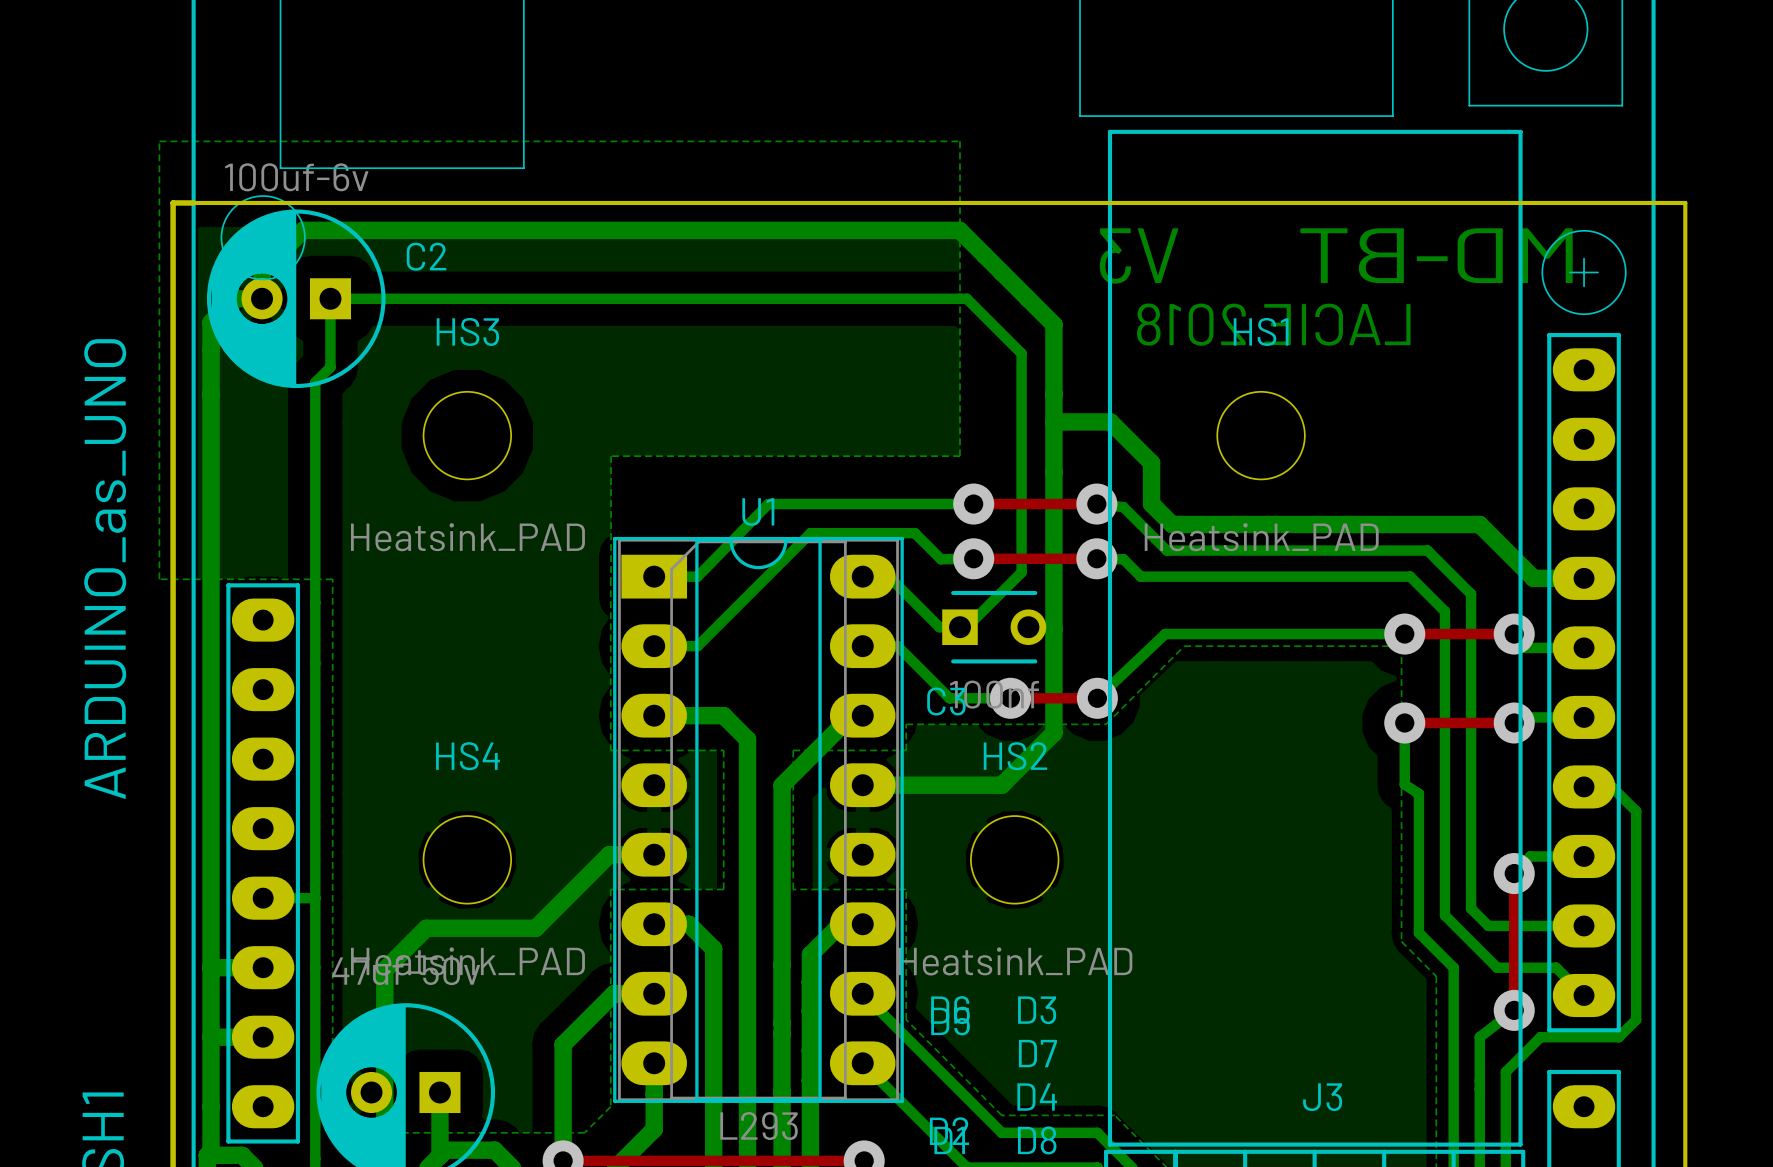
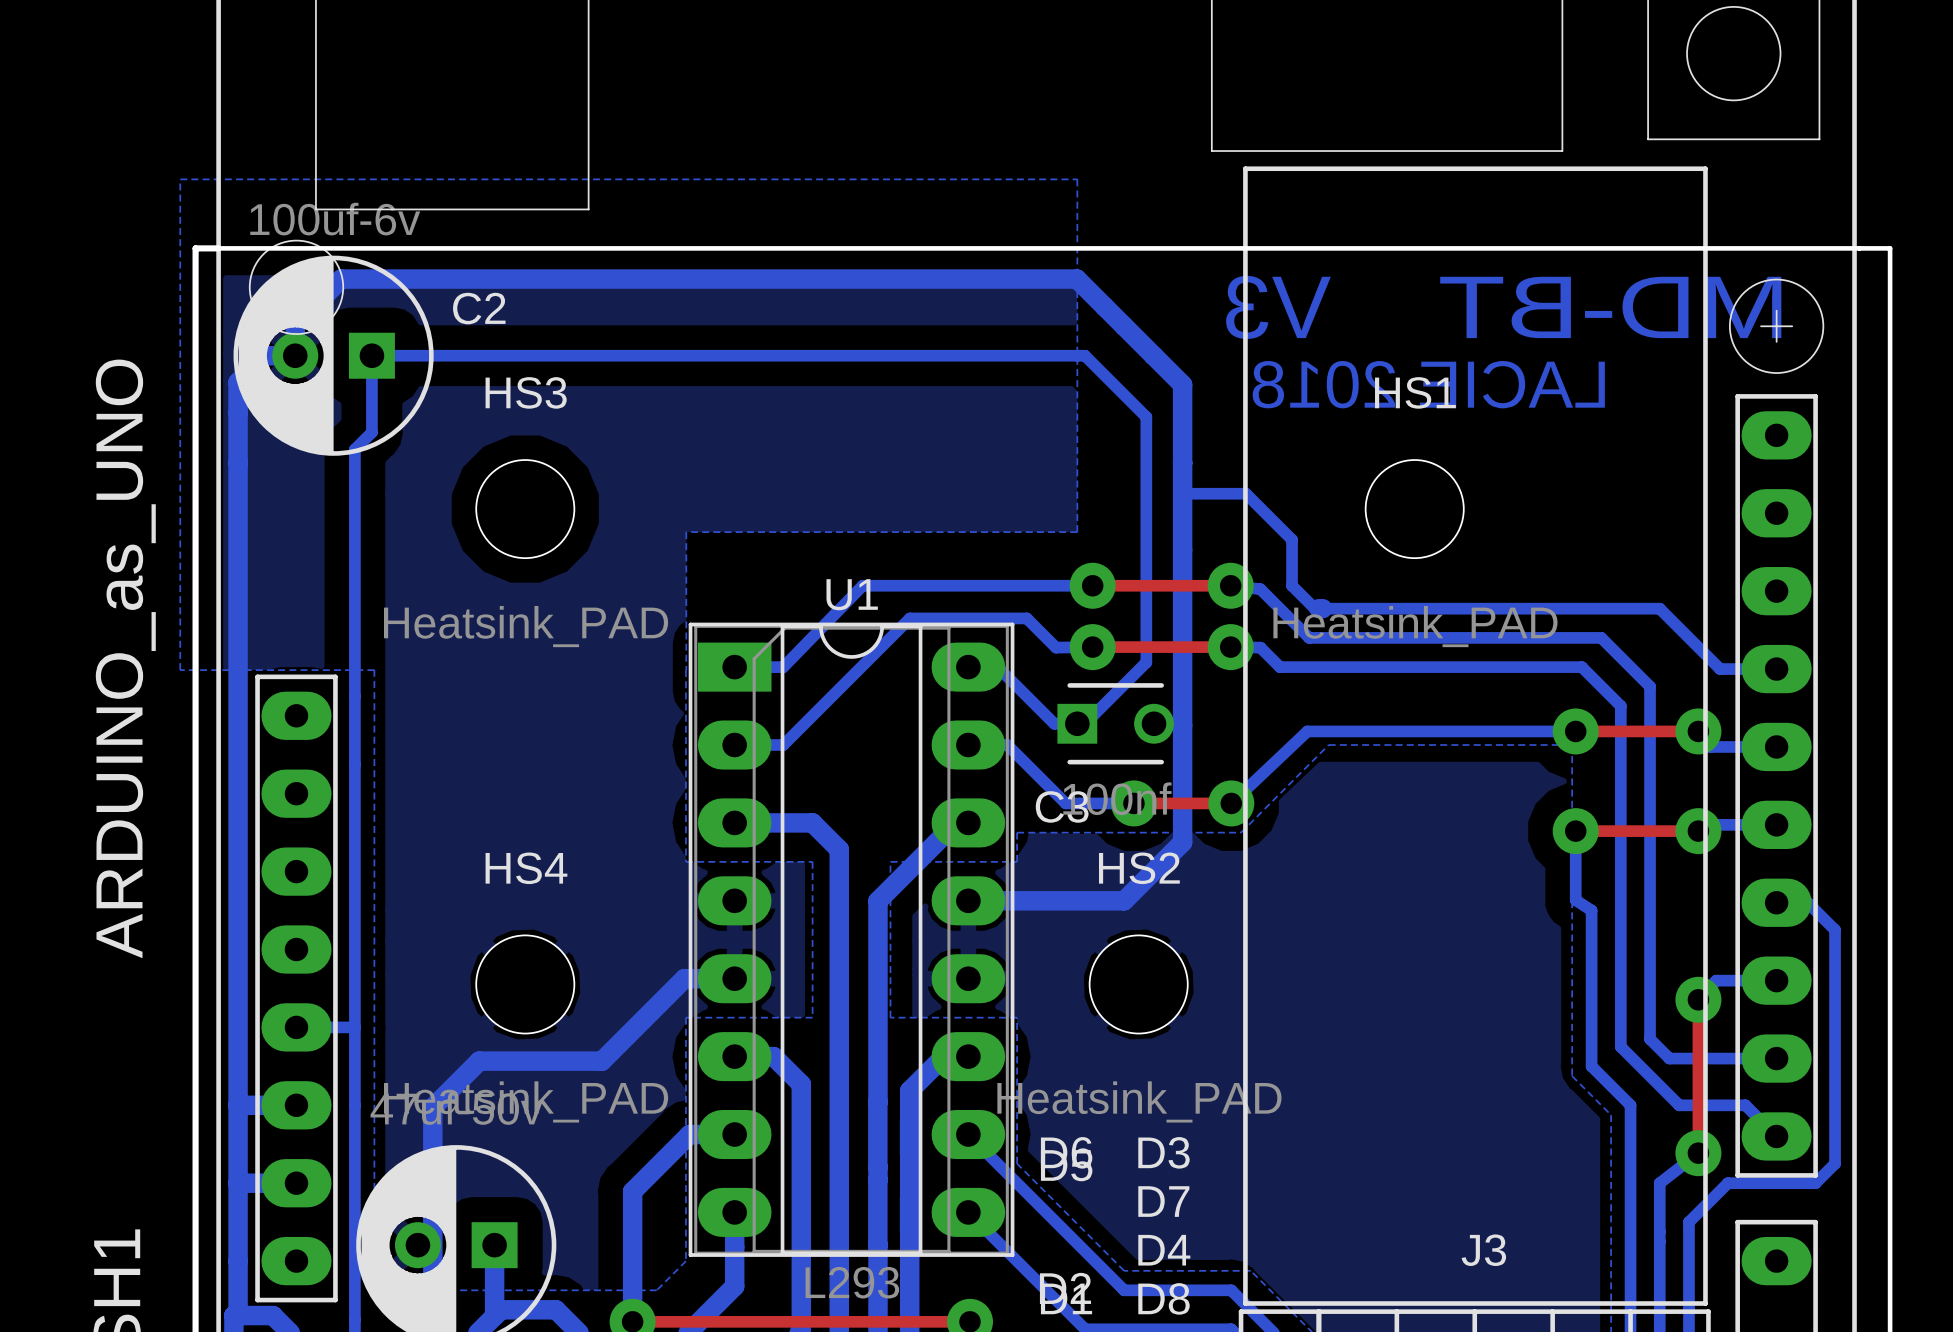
bottom track width: thick (1053, 421) (1110, 421) (1151, 462) (1151, 504) (1172, 524) (1175, 524) -> thin (1182, 493) (1246, 493) (1292, 539) (1292, 585) (1314, 608) (1318, 608)
bottom track width: thick (1178, 524) (1479, 524) (1533, 578) (1584, 578) -> thin (1322, 608) (1659, 608) (1720, 669) (1776, 669)

